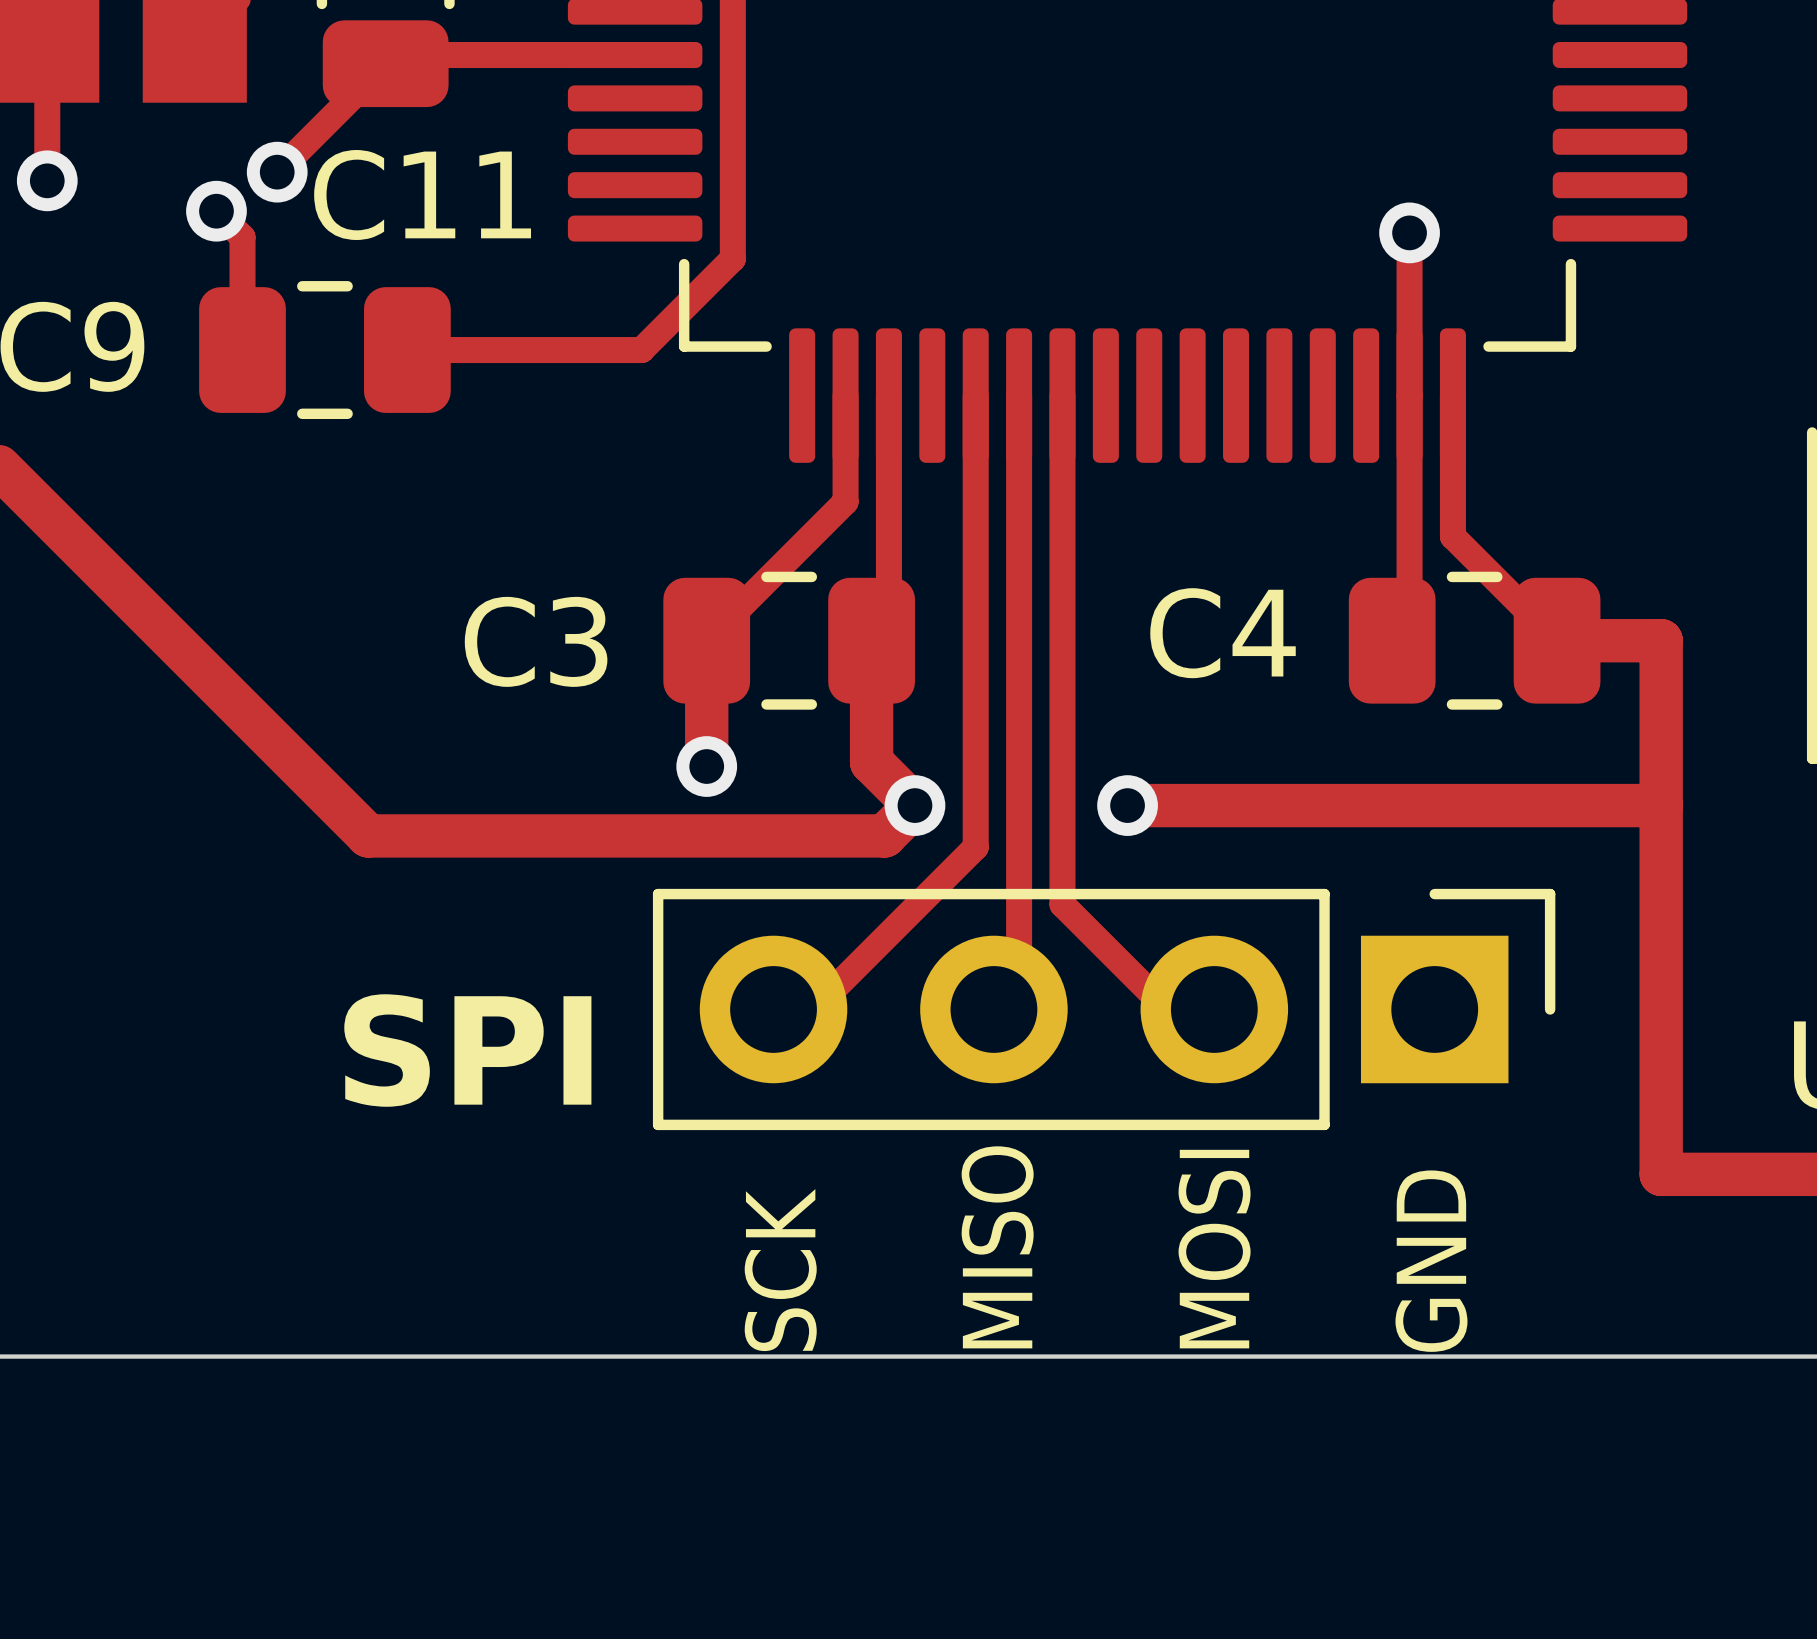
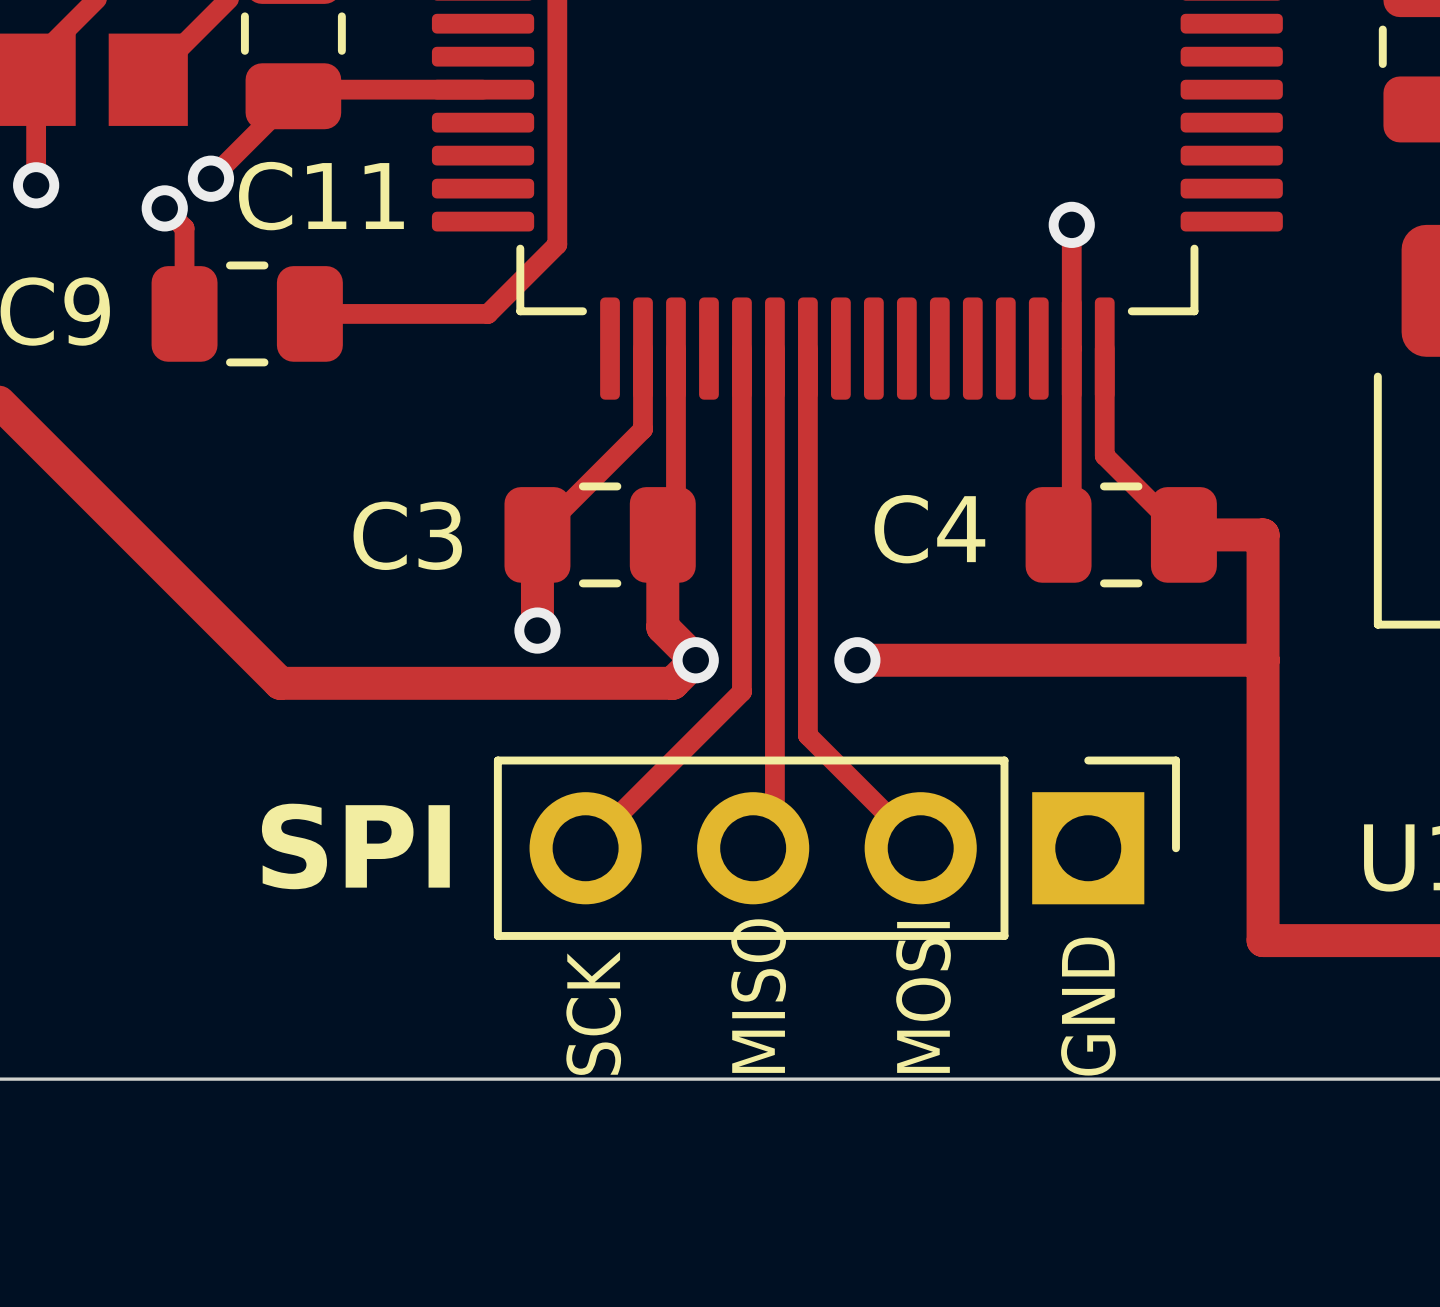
part position: (1104, 1009) -> (836, 848)

